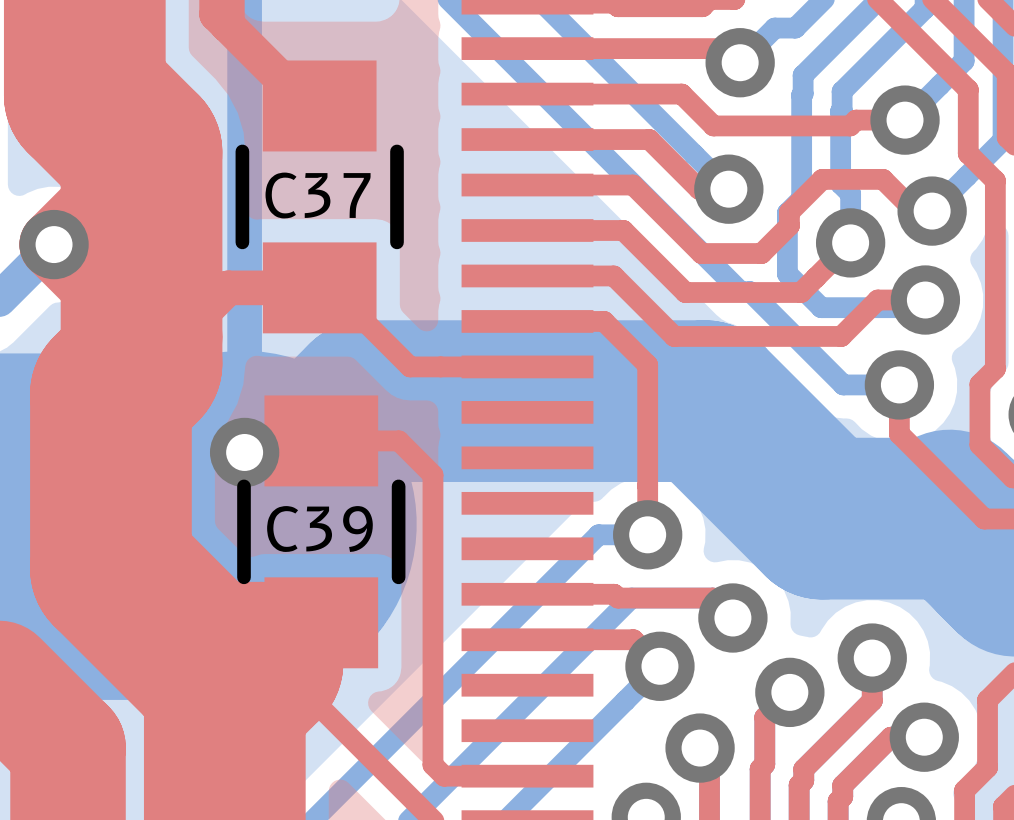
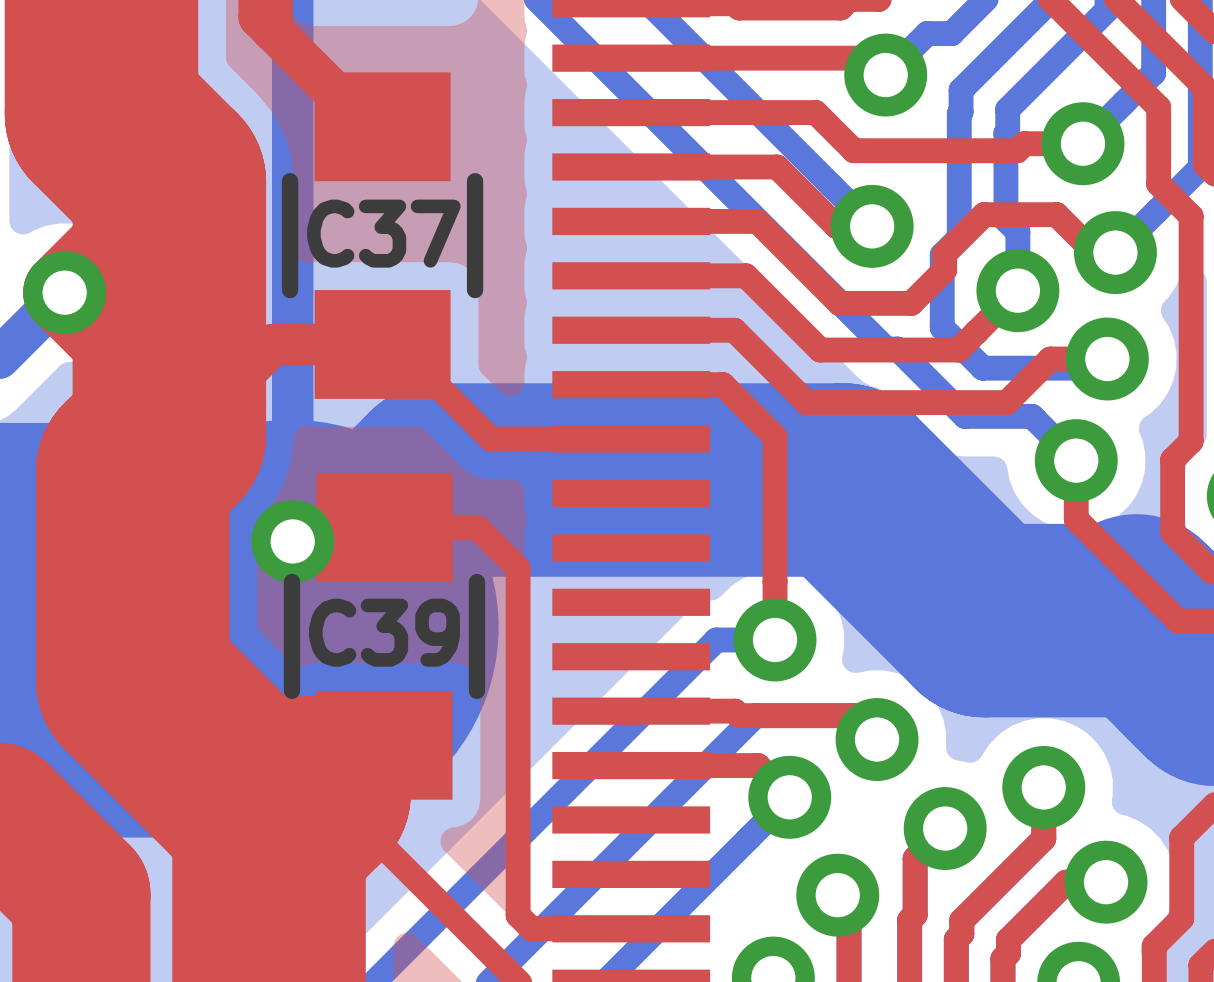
bottom track: (806, 347) (843, 384) (899, 384) -> (965, 416) (1032, 416) (1076, 460)

